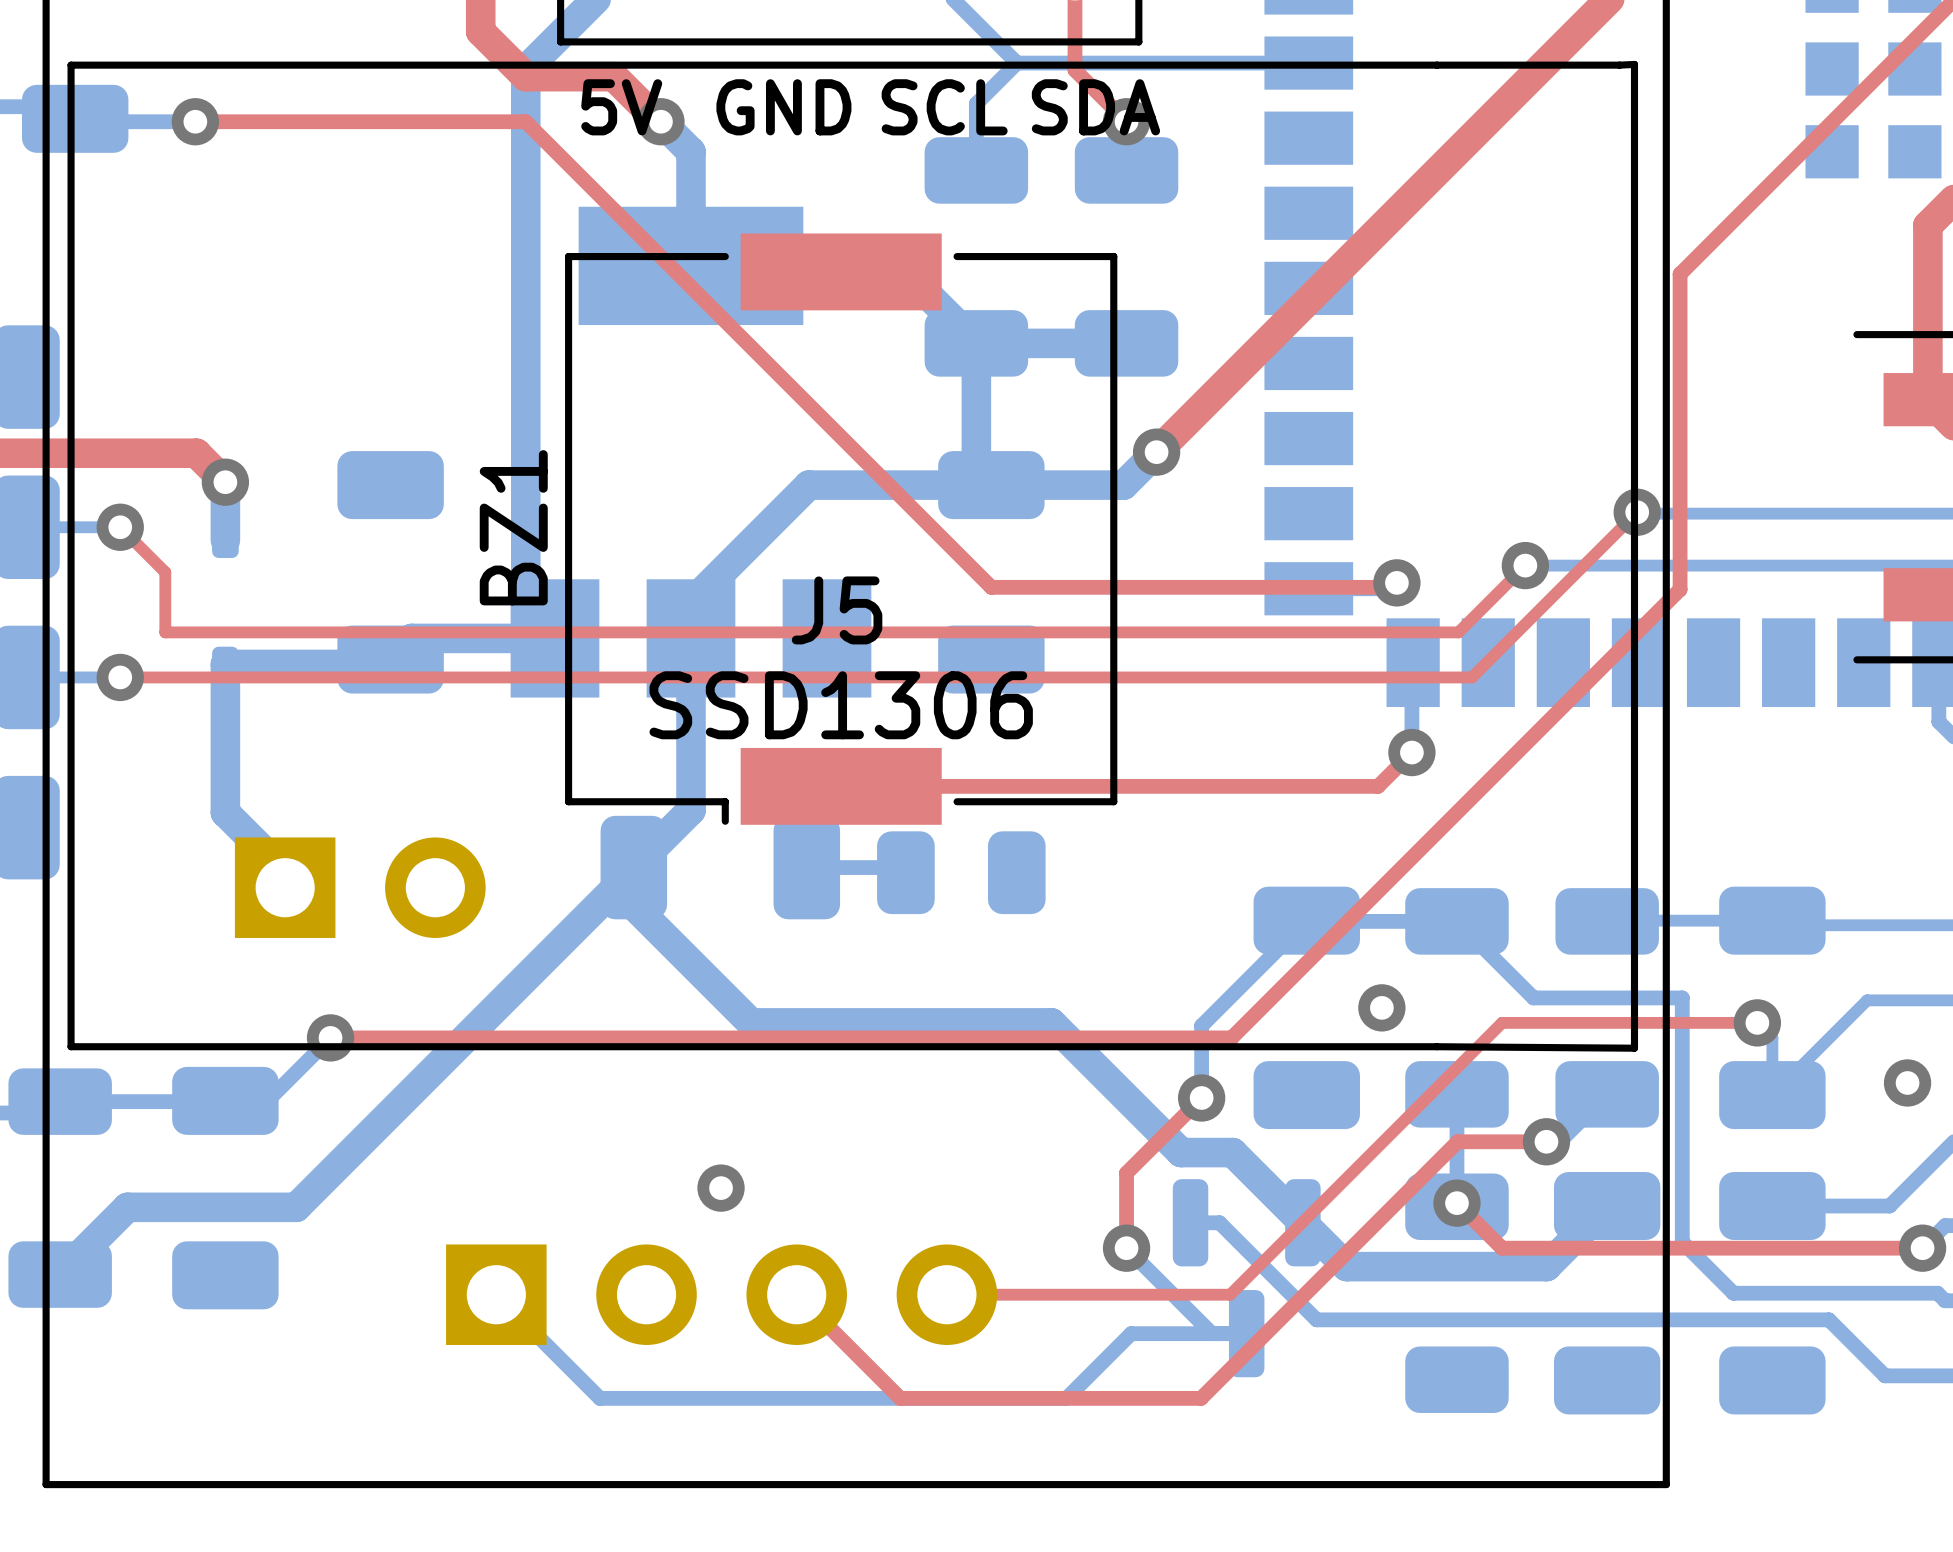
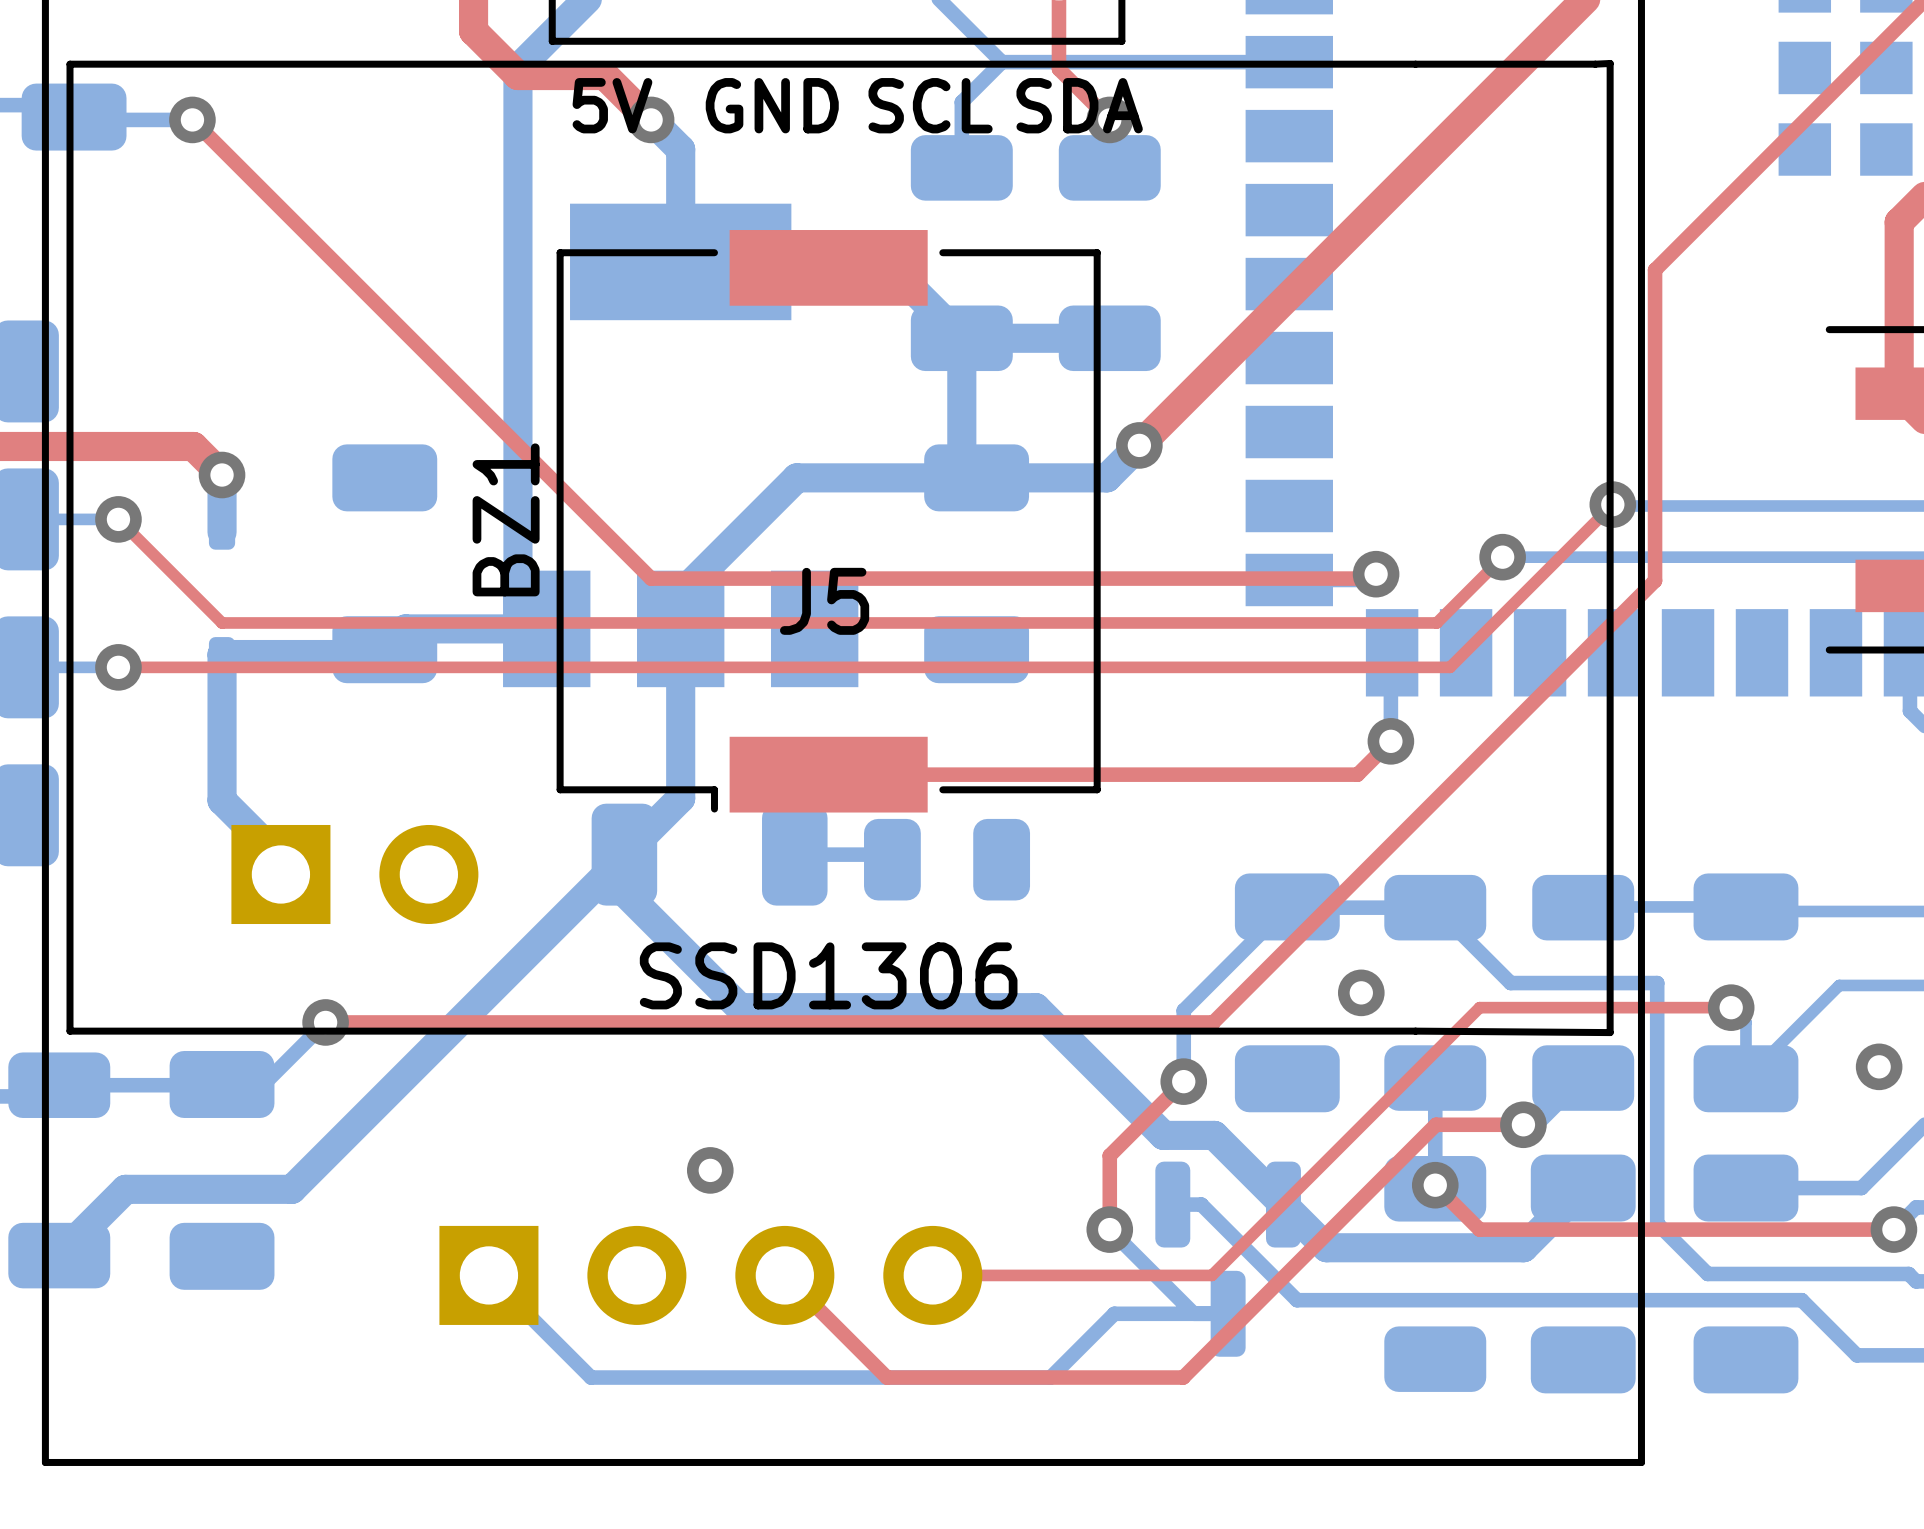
top track: (195, 121) (525, 121) (991, 587) -> (192, 119) (651, 578) (976, 578)
top track: (165, 572) (165, 632) (225, 632) -> (162, 563) (222, 622)
J5 value position: SSD1306 (841, 705) -> SSD1306 (828, 975)

